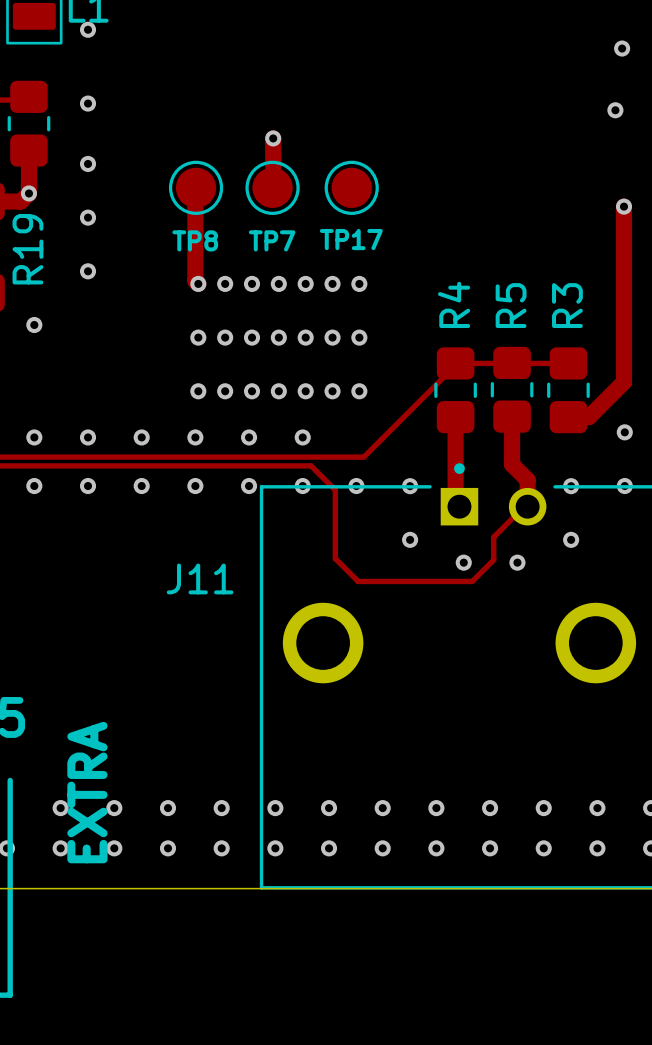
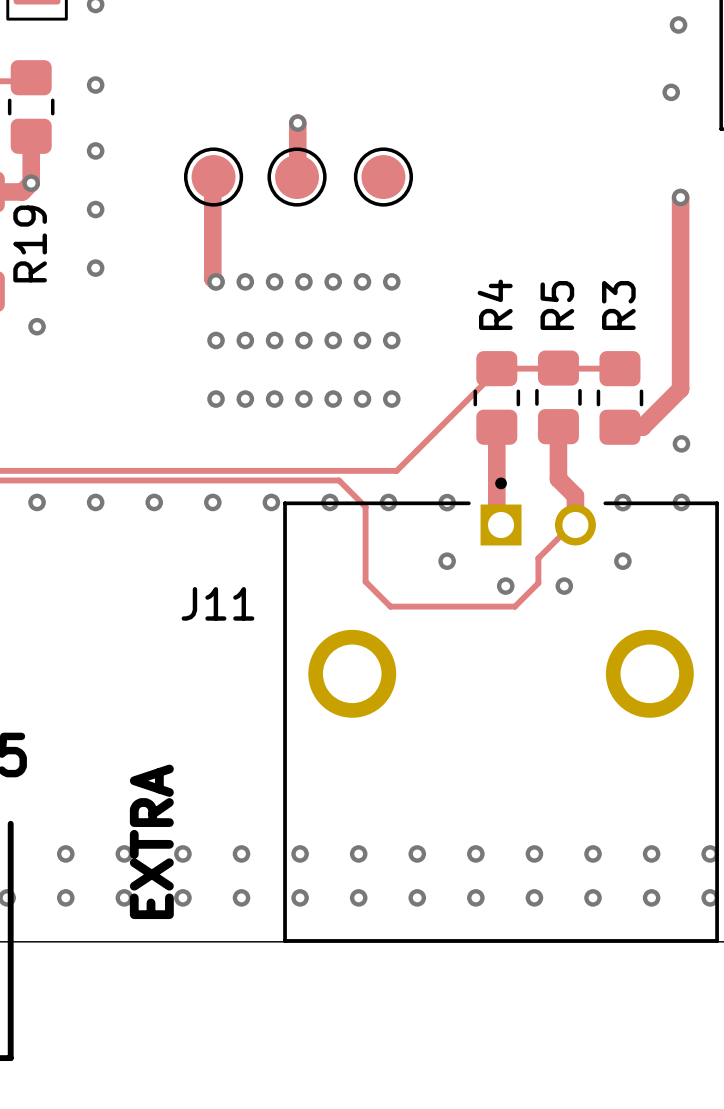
TP17 name: TP17 (351, 239) -> none
TP8 name: TP8 (195, 240) -> none
TP7 name: TP7 (272, 240) -> none
via: (34, 437) -> none
via: (88, 437) -> none
via: (141, 437) -> none
via: (195, 437) -> none
via: (249, 437) -> none
via: (302, 437) -> none
text position: EXTRA (87, 792) -> EXTRA (151, 841)

